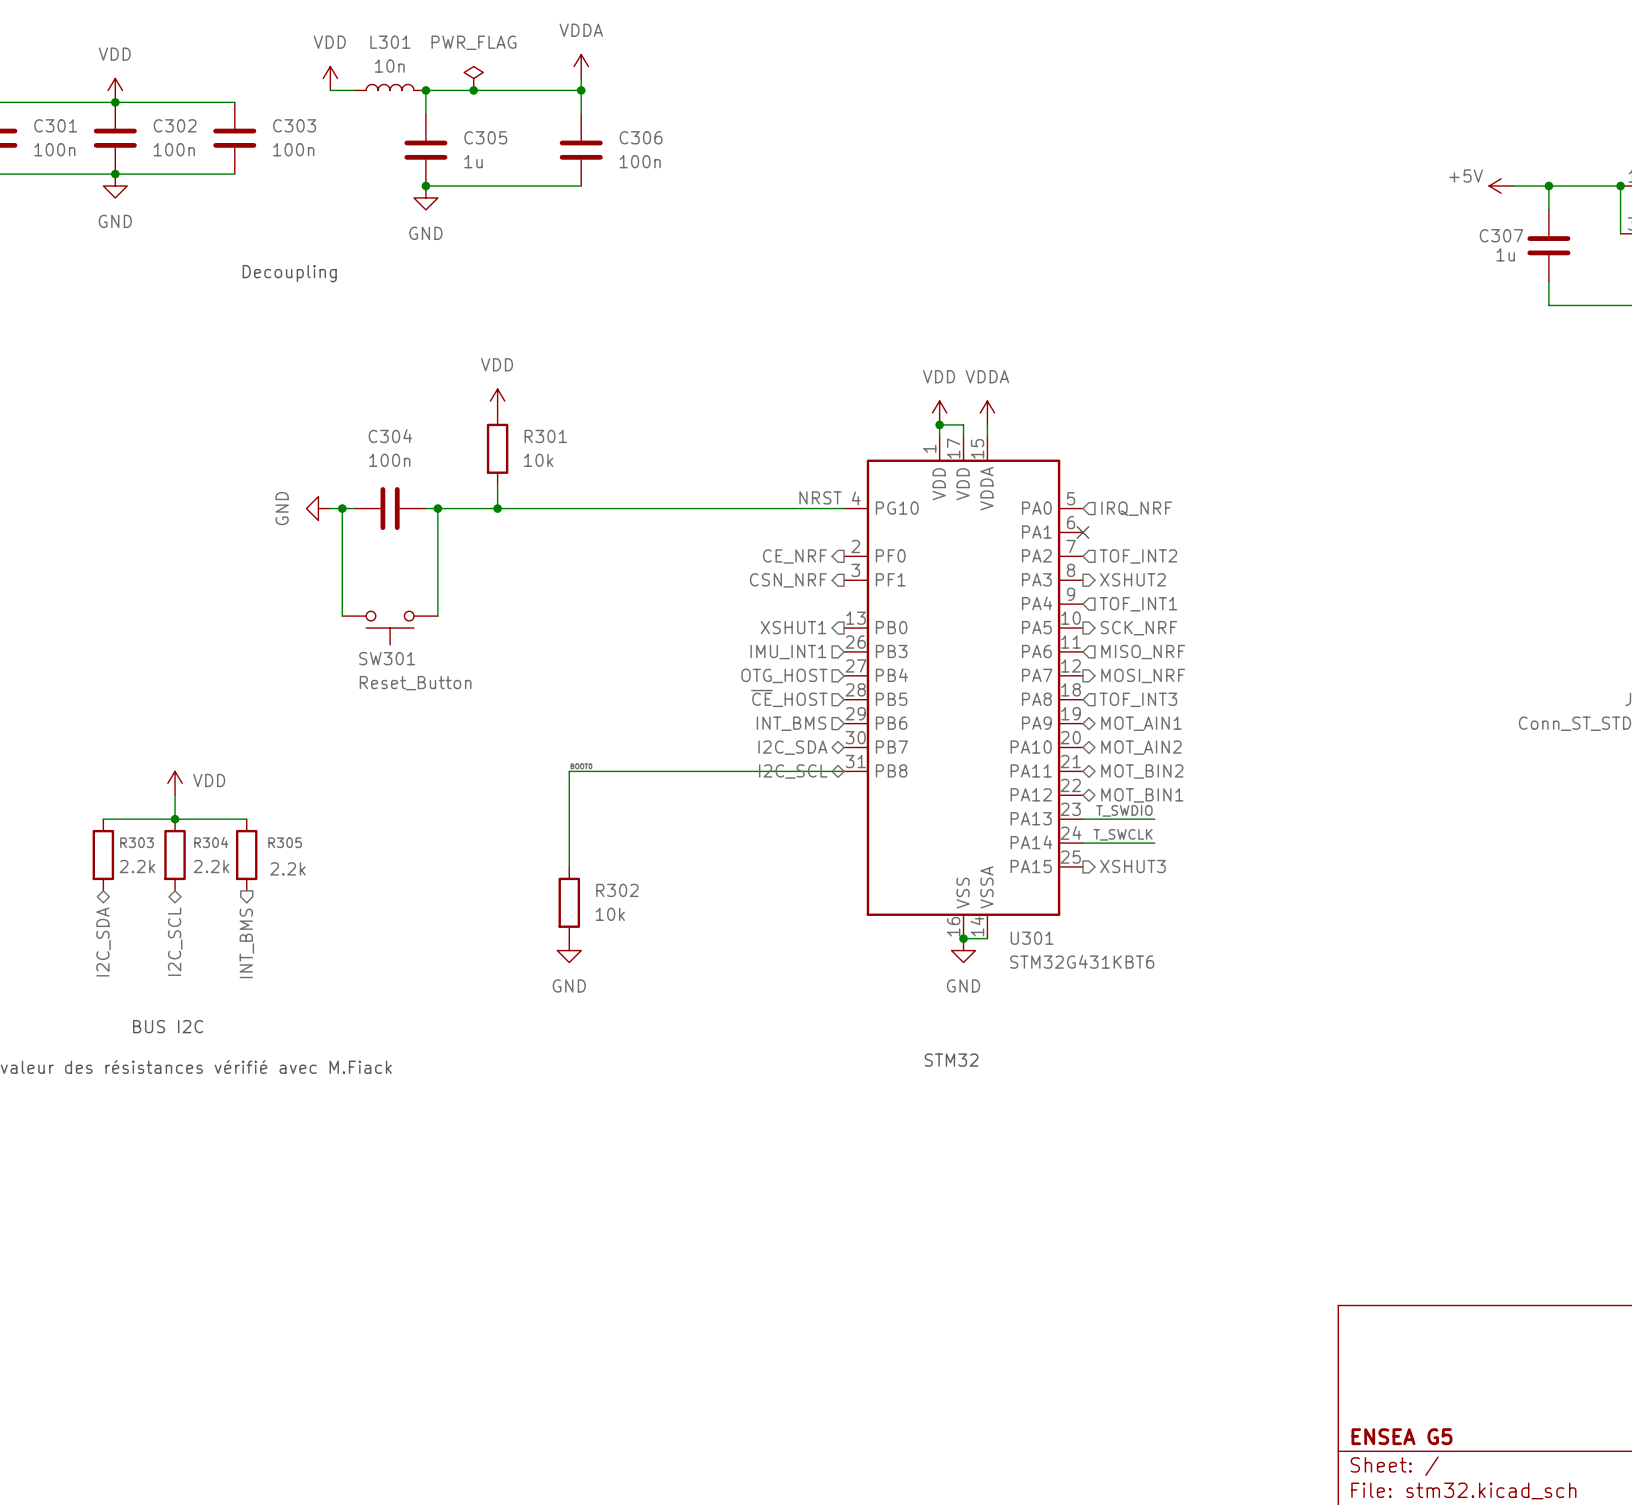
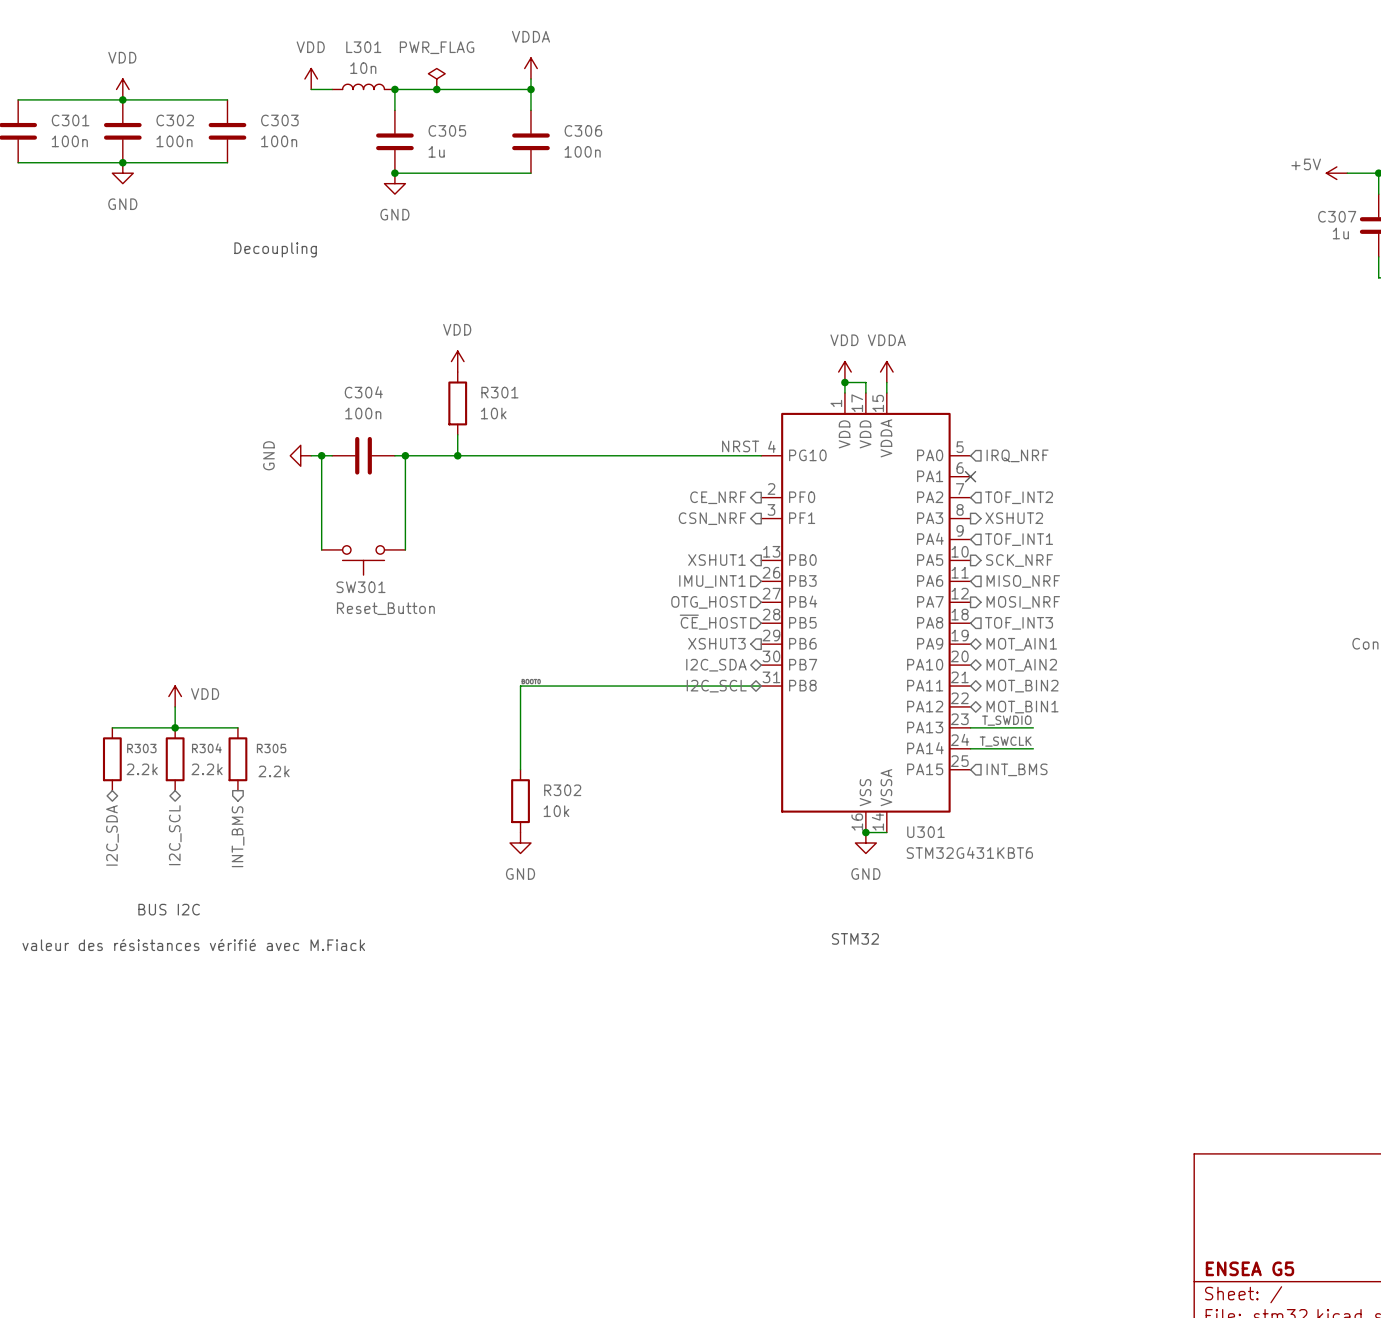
hierarchical label shape: input (791, 723) -> output (716, 643)
hierarchical label: INT_BMS (791, 723) -> XSHUT3 (716, 643)
hierarchical label shape: output (1132, 866) -> input (1017, 769)
hierarchical label: XSHUT3 (1132, 866) -> INT_BMS (1017, 769)

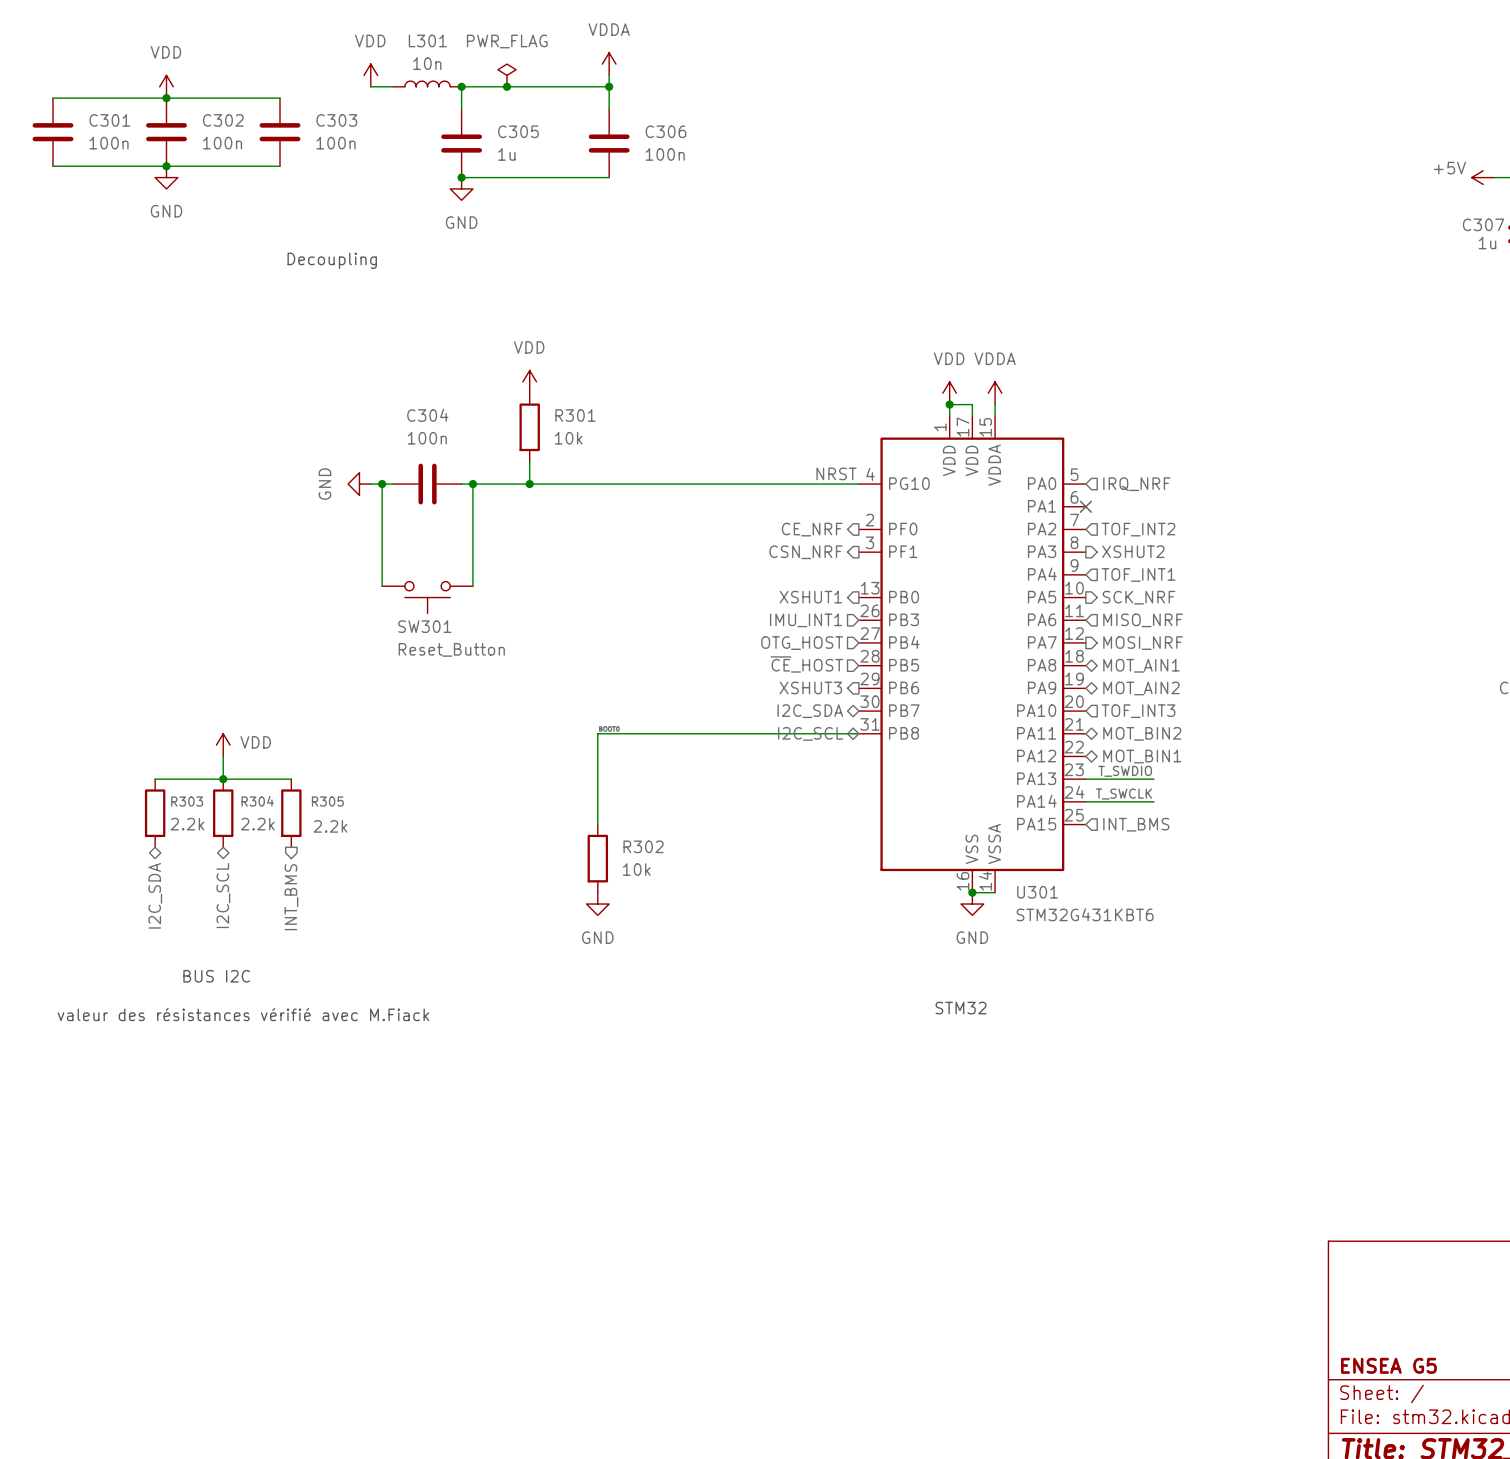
hierarchical label shape: input (1019, 623) -> bidirectional (1141, 665)
hierarchical label: TOF_INT3 (1019, 623) -> MOT_AIN1 (1141, 665)
hierarchical label: MOT_AIN1 (1021, 644) -> MOT_AIN2 (1141, 688)
hierarchical label shape: bidirectional (1021, 665) -> input (1138, 711)
hierarchical label: MOT_AIN2 (1021, 665) -> TOF_INT3 (1138, 711)

